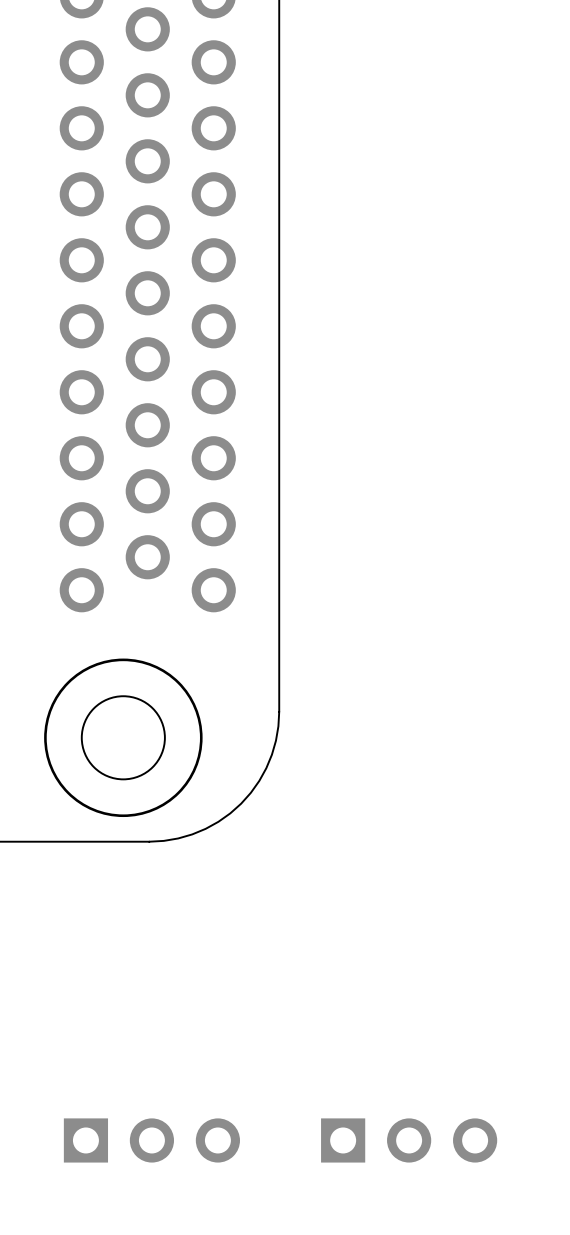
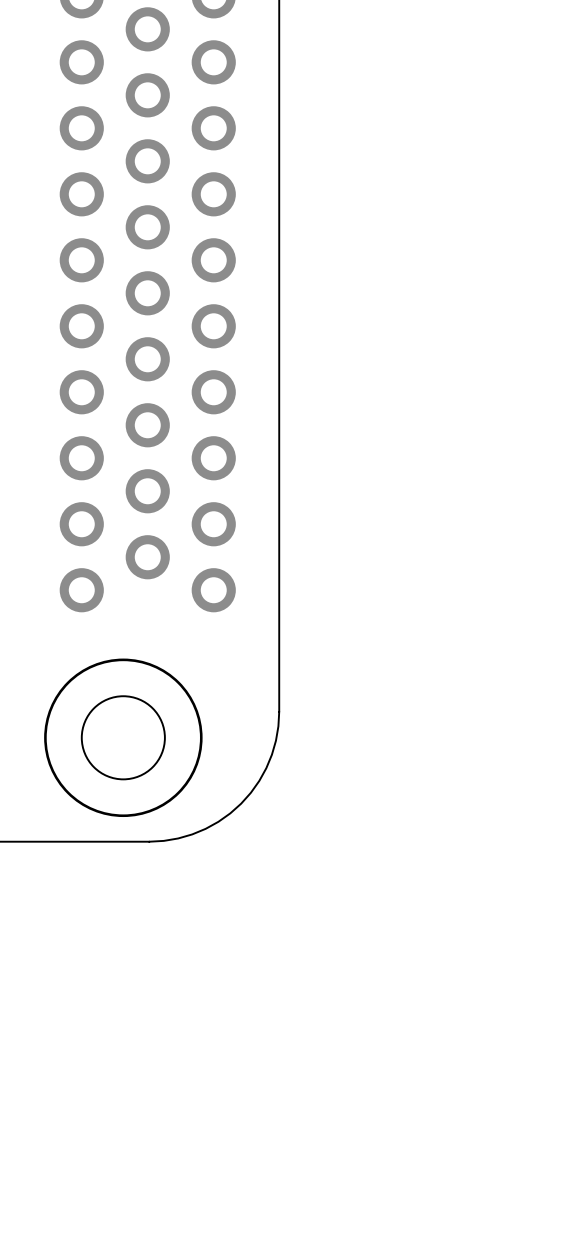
part: (151, 1140) -> none
part: (409, 1140) -> none

